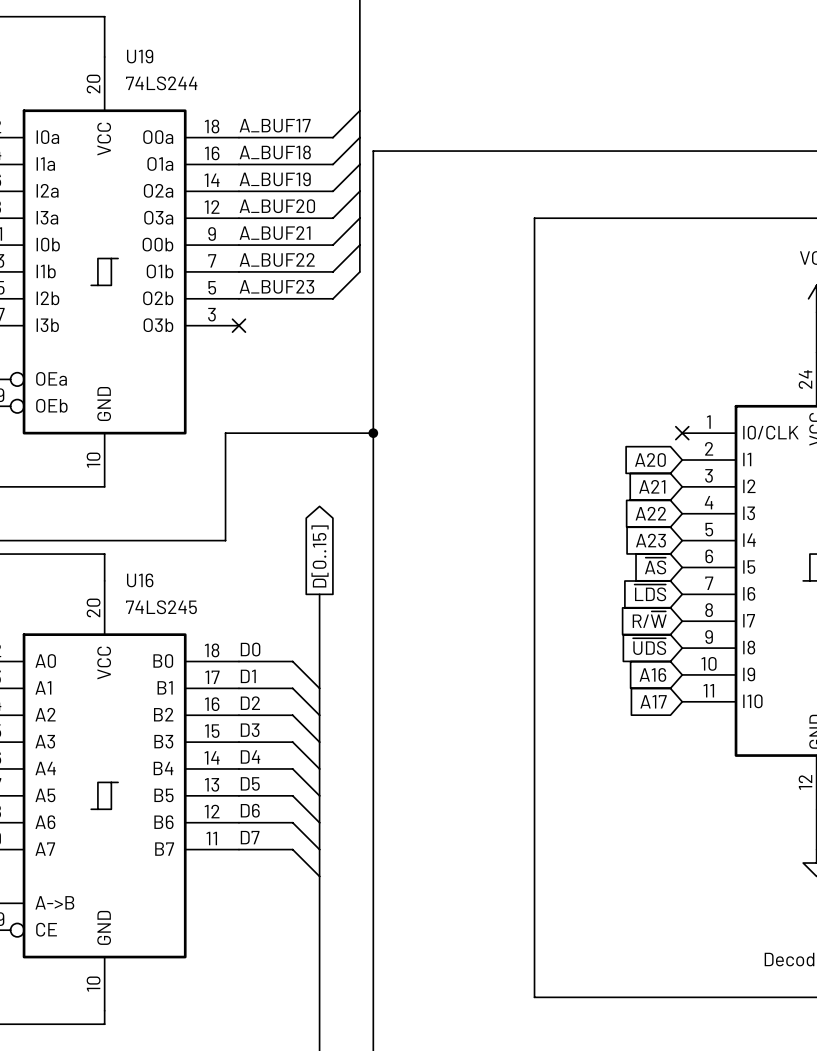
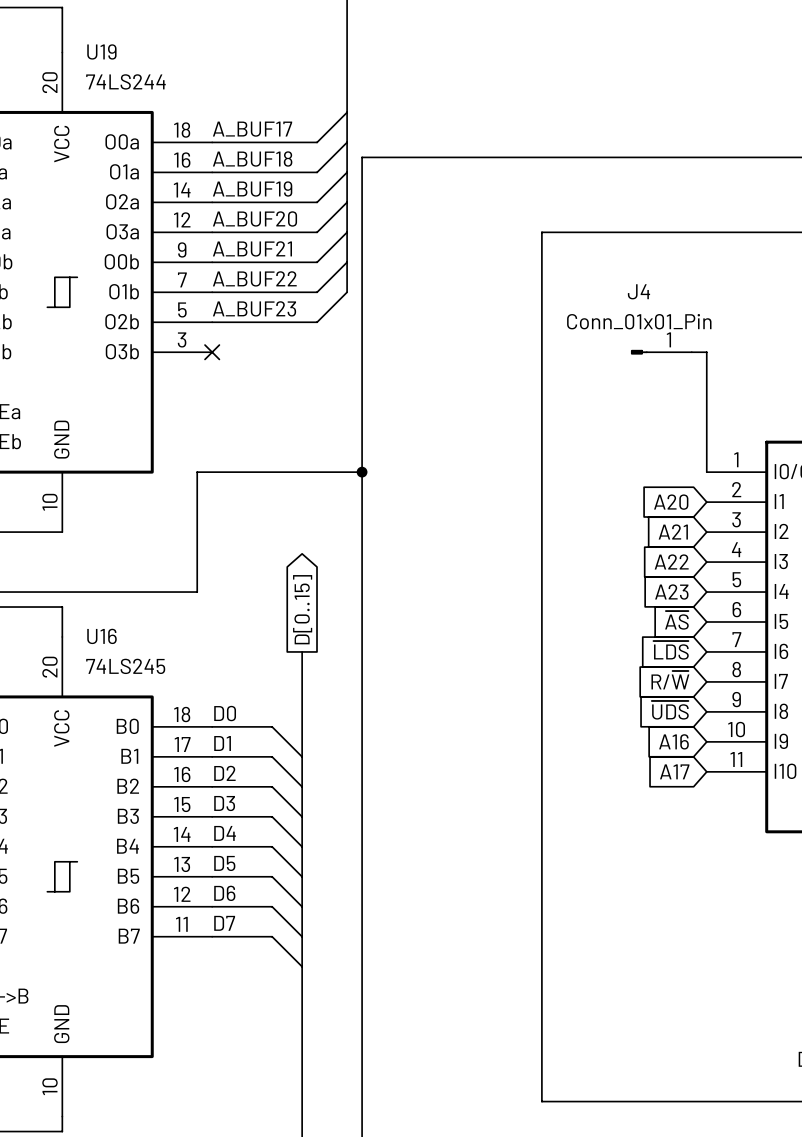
J4: none -> Conn_01x01_Pin (661, 352)
wire: none -> (691, 352) (706, 352) (706, 472)
no-connect mark: (682, 433) -> none

